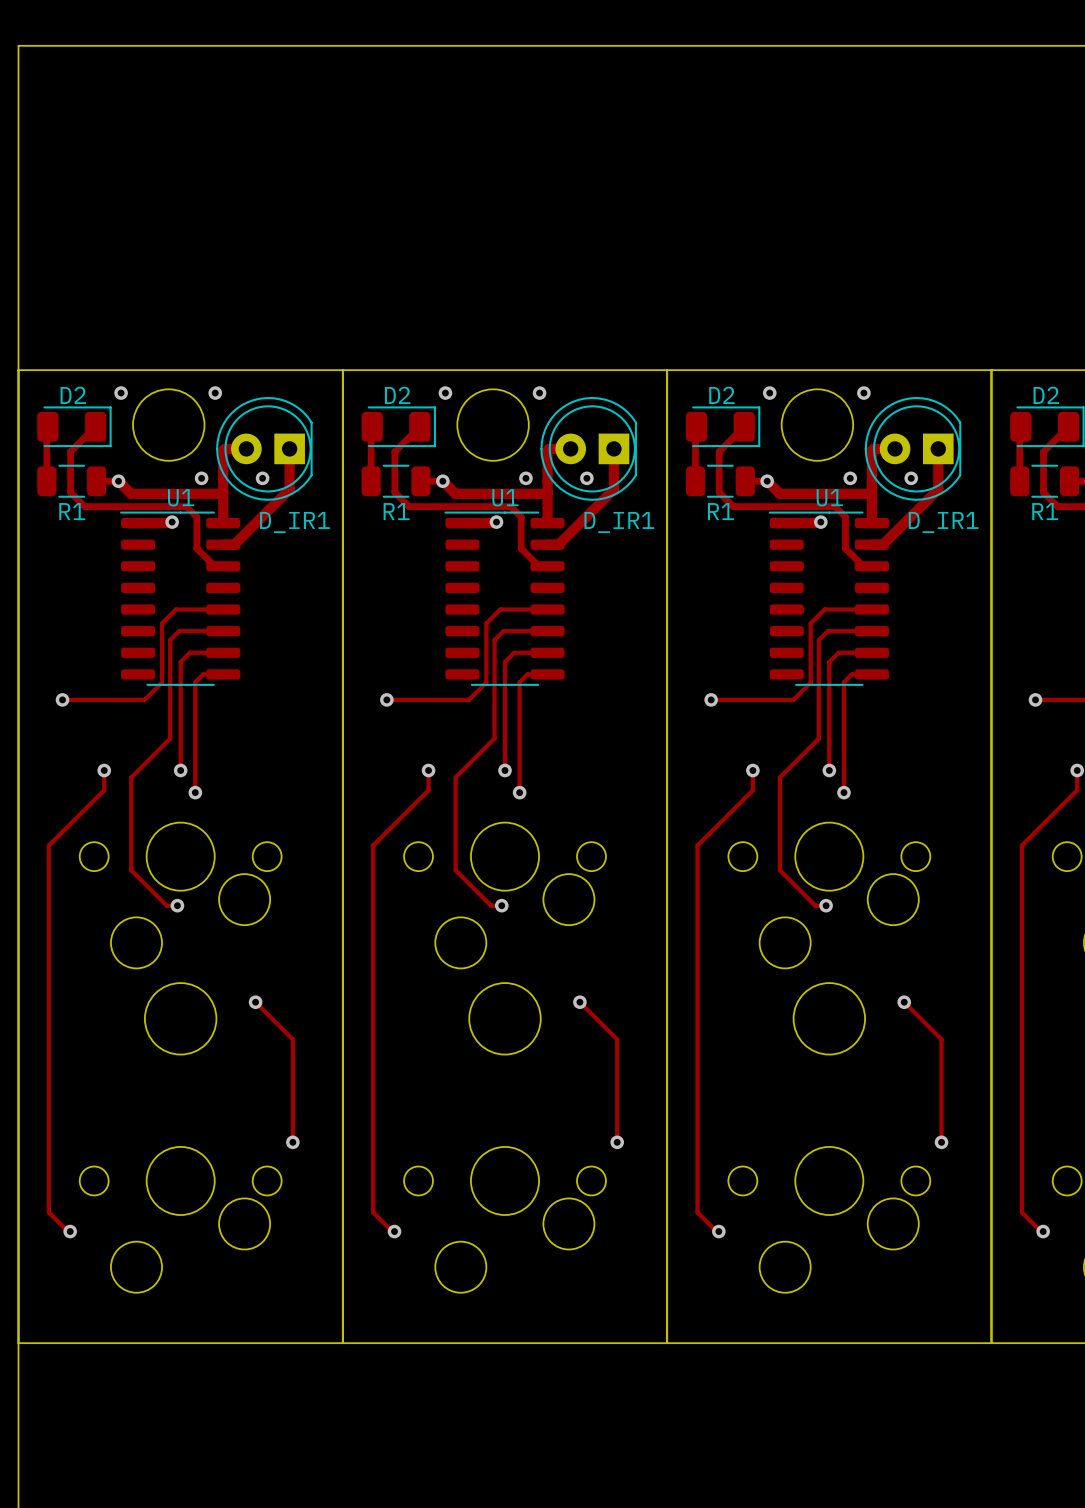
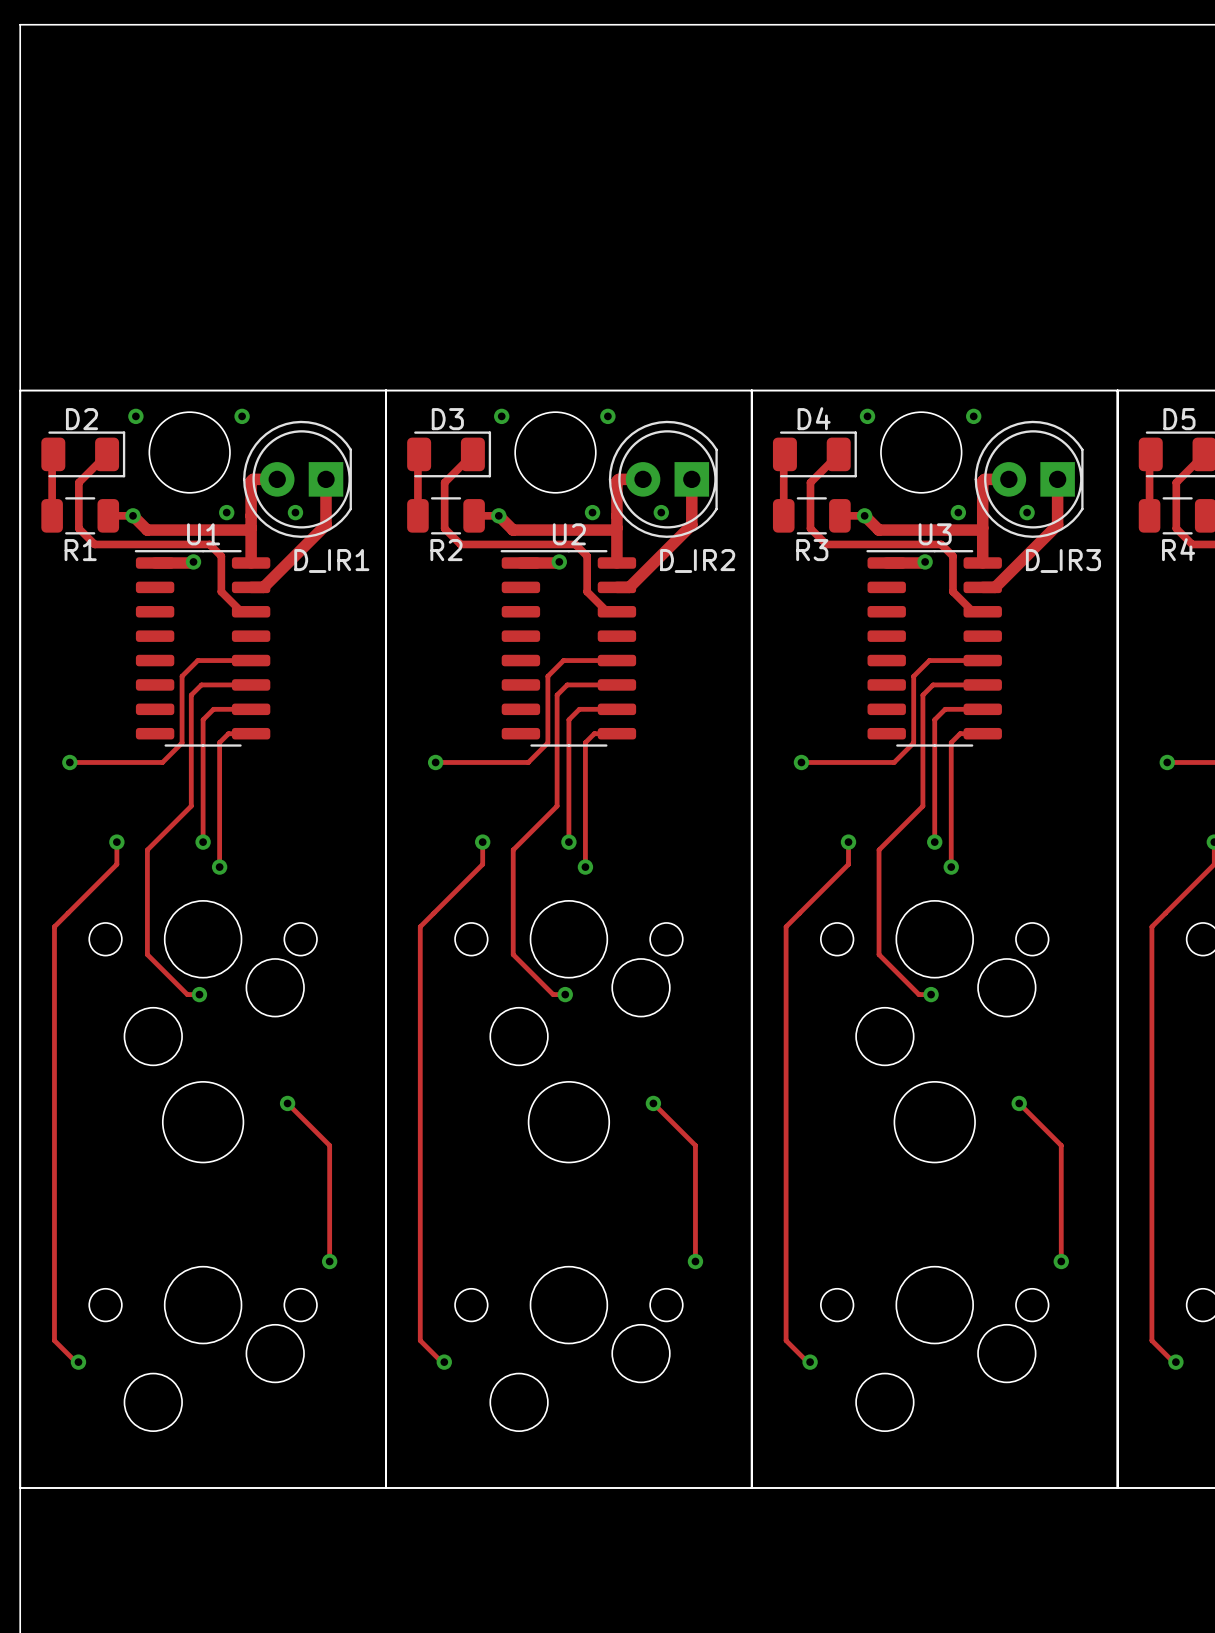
D2 name: D2 (397, 395) -> D3 (447, 419)
D2 name: D2 (721, 395) -> D4 (814, 418)
D2 name: D2 (1046, 395) -> D5 (1179, 419)
U1 name: U1 (505, 497) -> U2 (569, 534)
U1 name: U1 (829, 497) -> U3 (935, 534)
R1 name: R1 (396, 511) -> R2 (446, 550)
R1 name: R1 (720, 511) -> R3 (812, 550)
R1 name: R1 (1045, 511) -> R4 (1178, 549)
D_IR1 name: D_IR1 (619, 522) -> D_IR2 (697, 560)
D_IR1 name: D_IR1 (943, 522) -> D_IR3 (1063, 560)

